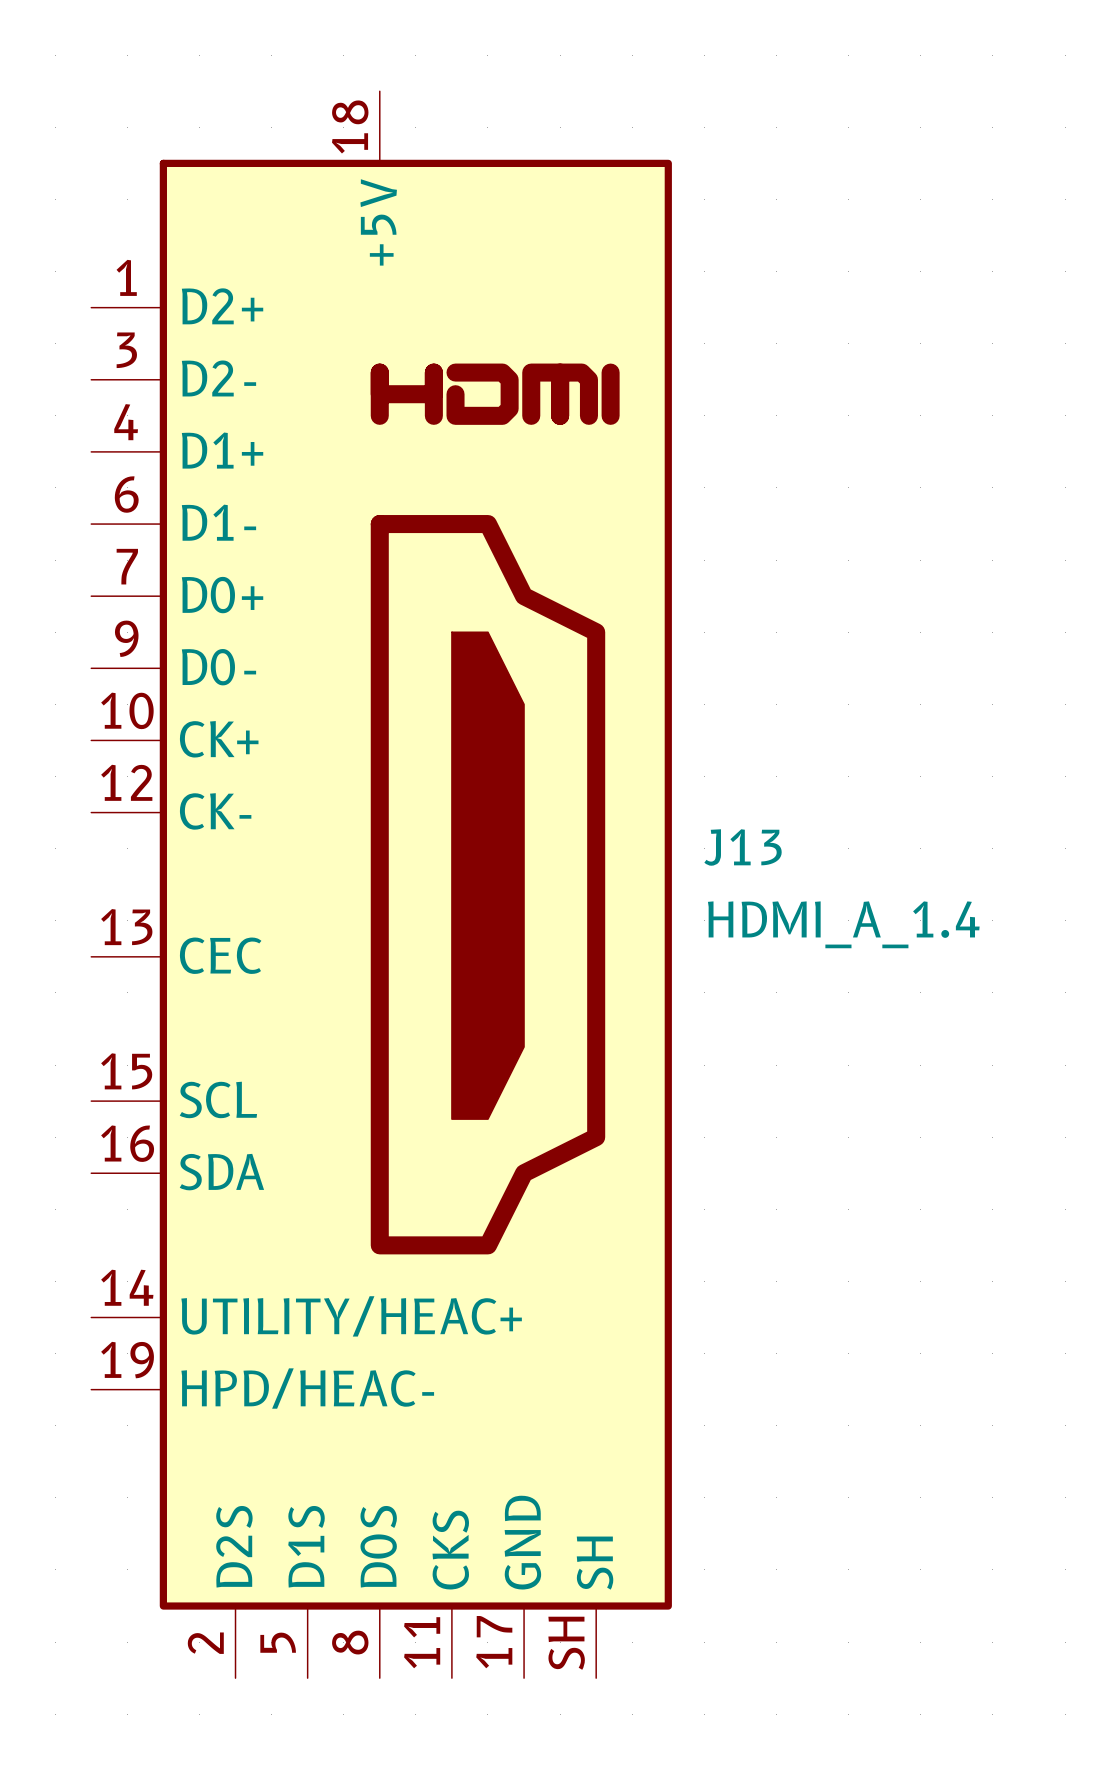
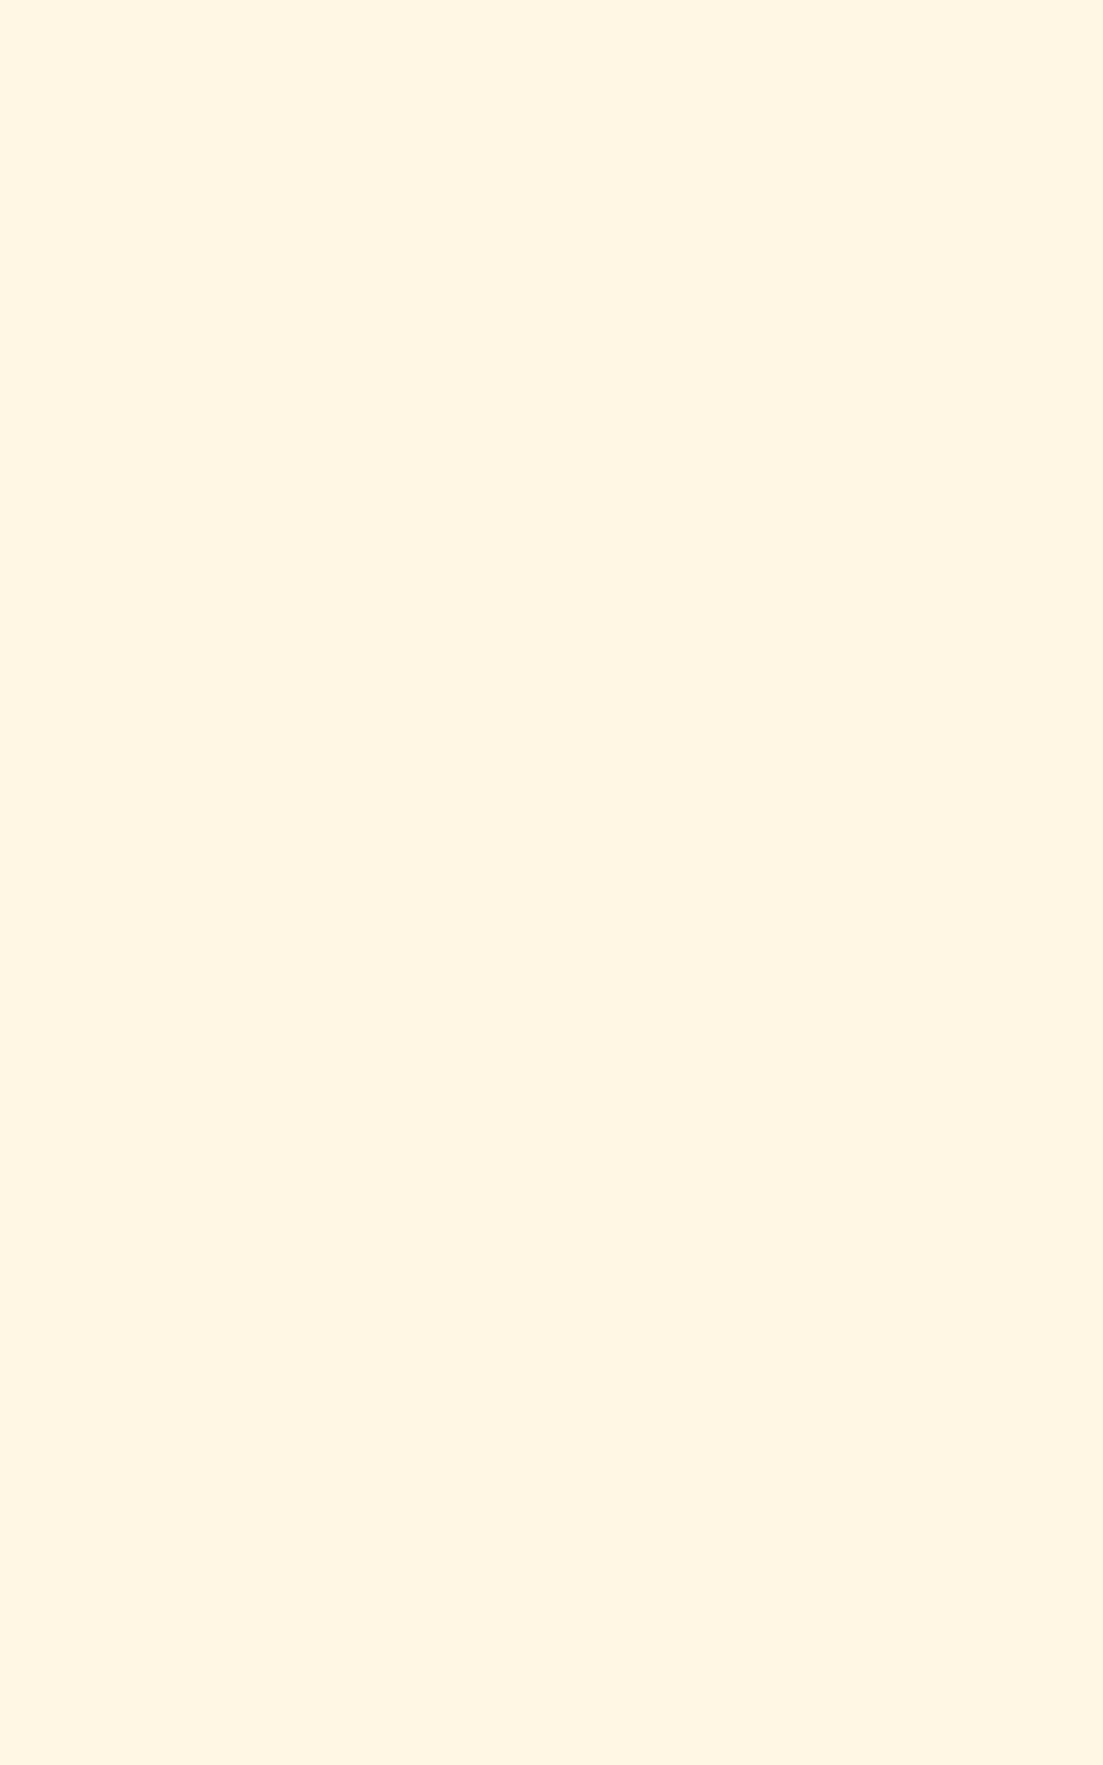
J13: HDMI_A_1.4 (381, 884) -> none

